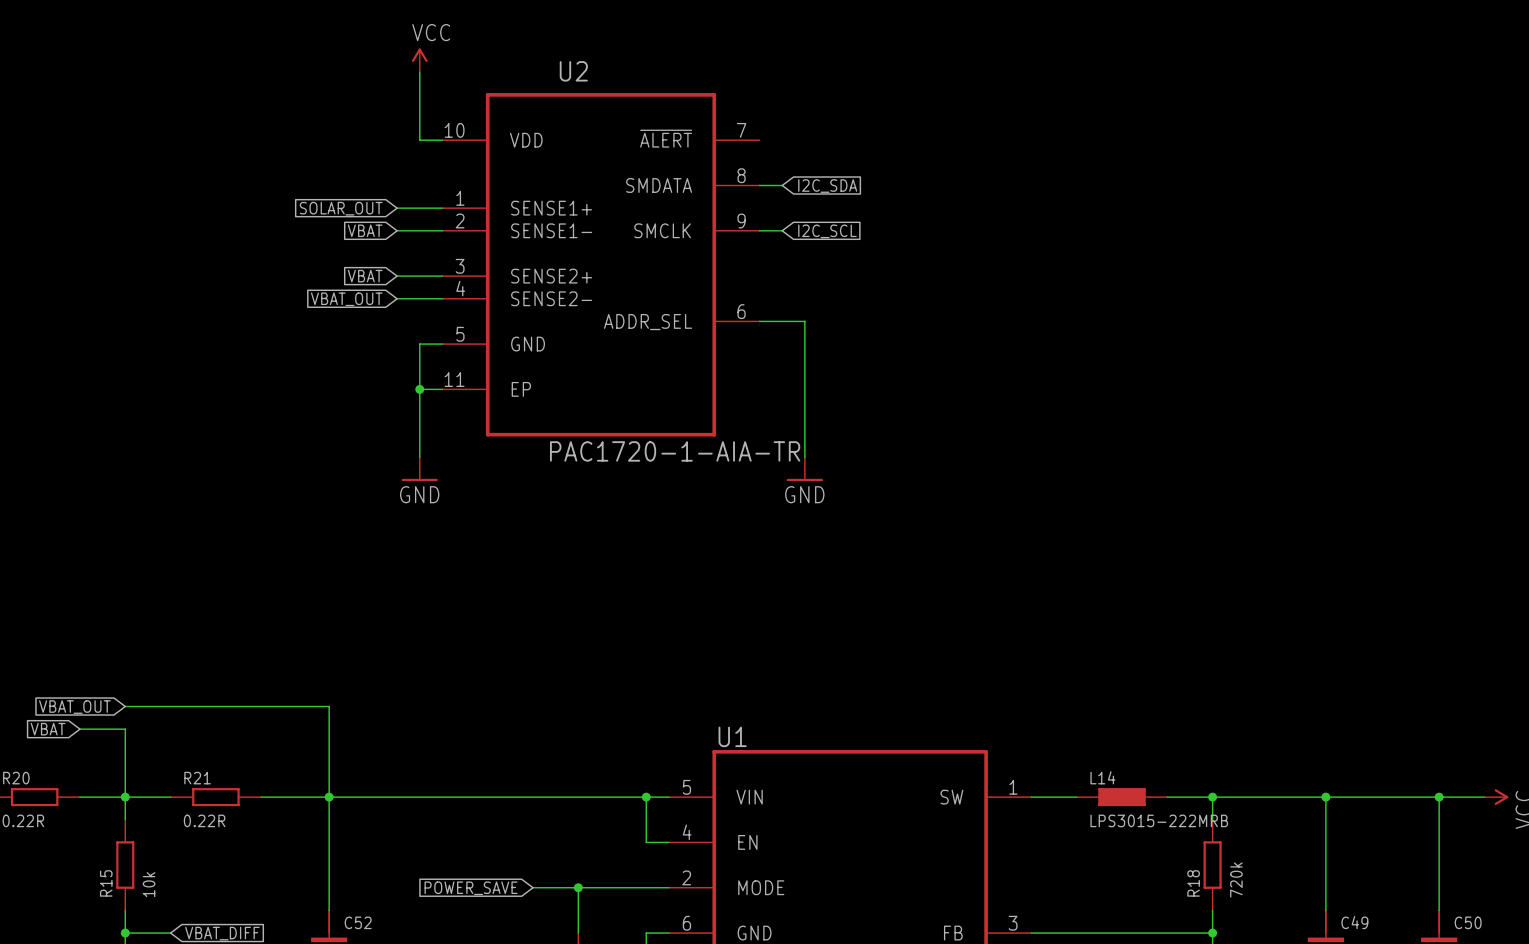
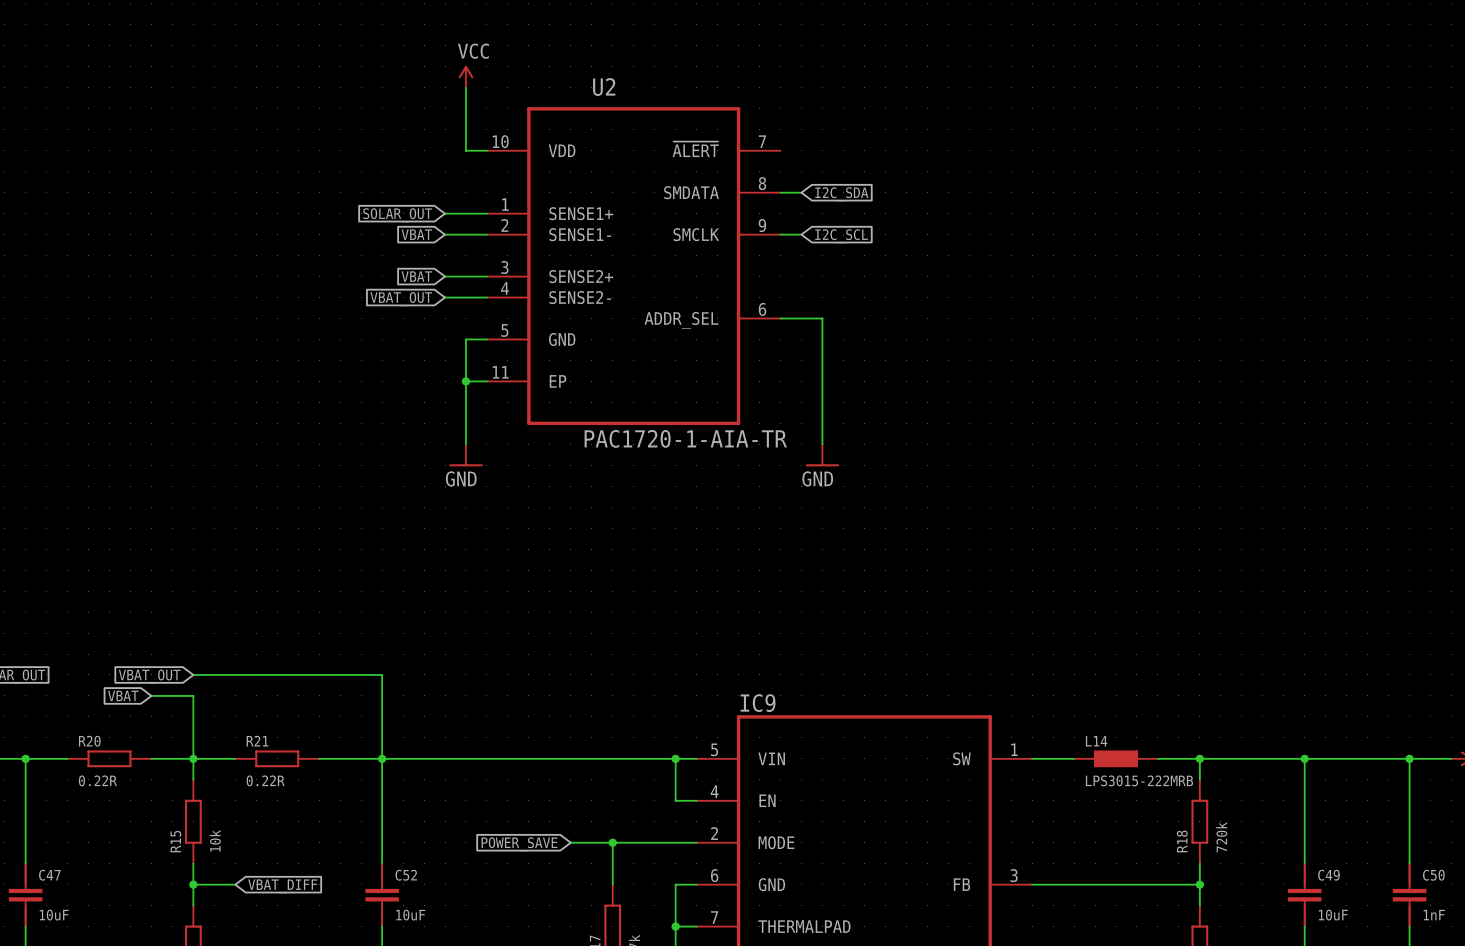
U1 name: U1 (732, 736) -> IC9 (758, 703)

